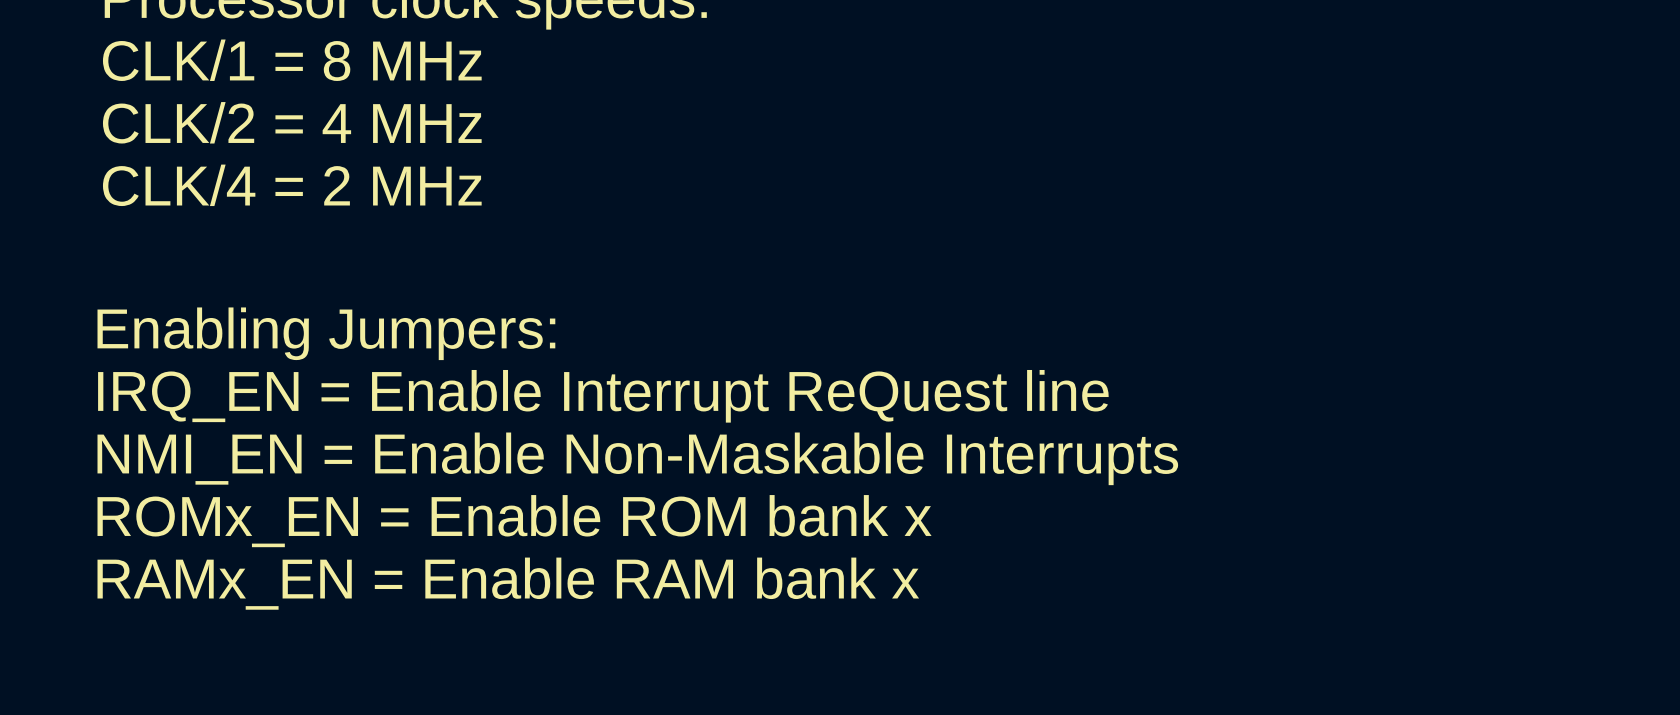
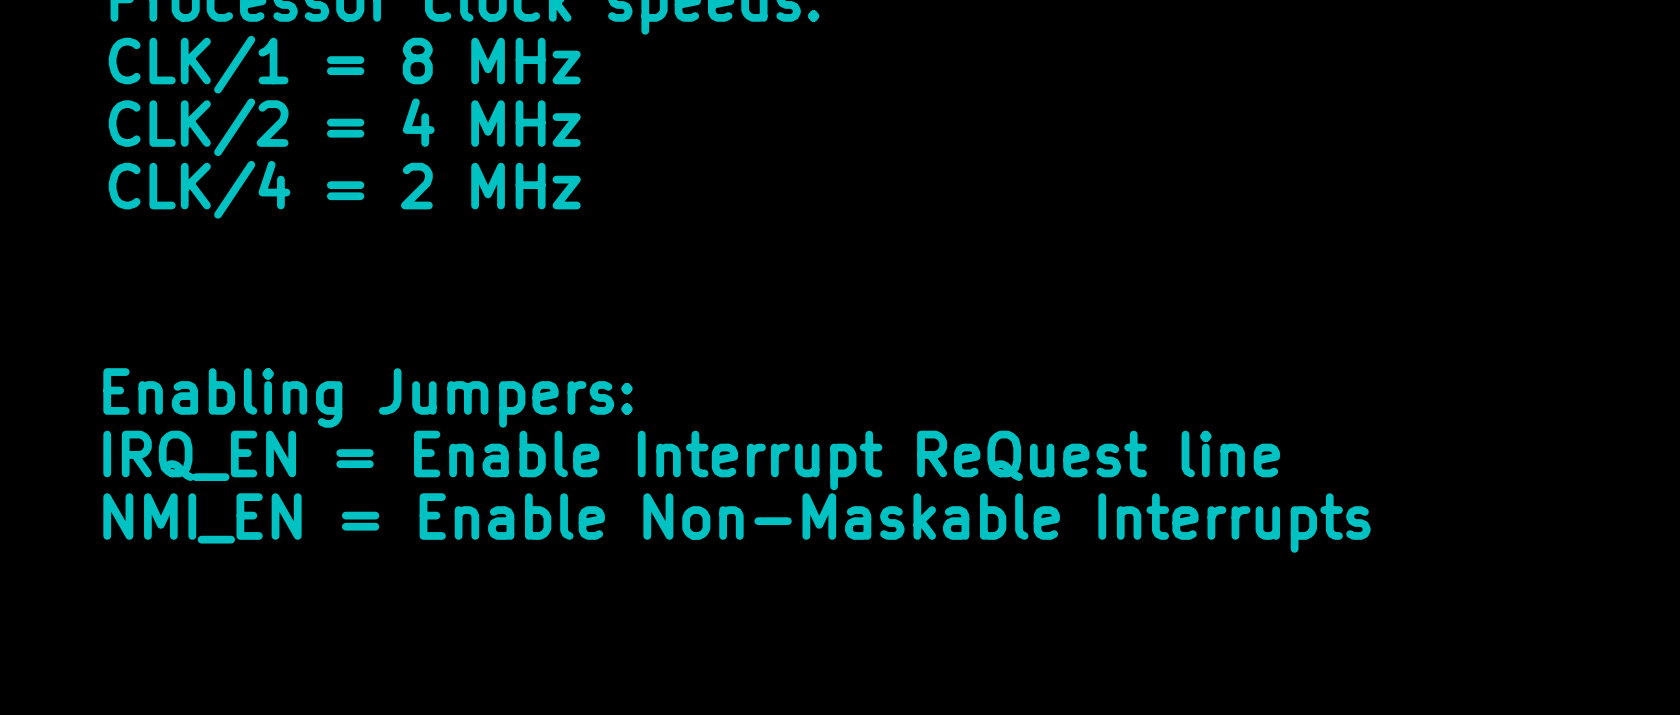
text: Enabling Jumpers: (326, 333) -> none
text: IRQ_EN = Enable Interrupt ReQuest line (603, 396) -> Enabling Jumpers: (368, 397)
text: NMI_EN = Enable Non-Maskable Interrupts (637, 458) -> IRQ_EN = Enable Interrupt ReQuest line (691, 460)
text: ROMx_EN = Enable ROM bank x (514, 521) -> NMI_EN = Enable Non-Maskable Interrupts (736, 523)
text: RAMx_EN = Enable RAM bank x (508, 583) -> none

